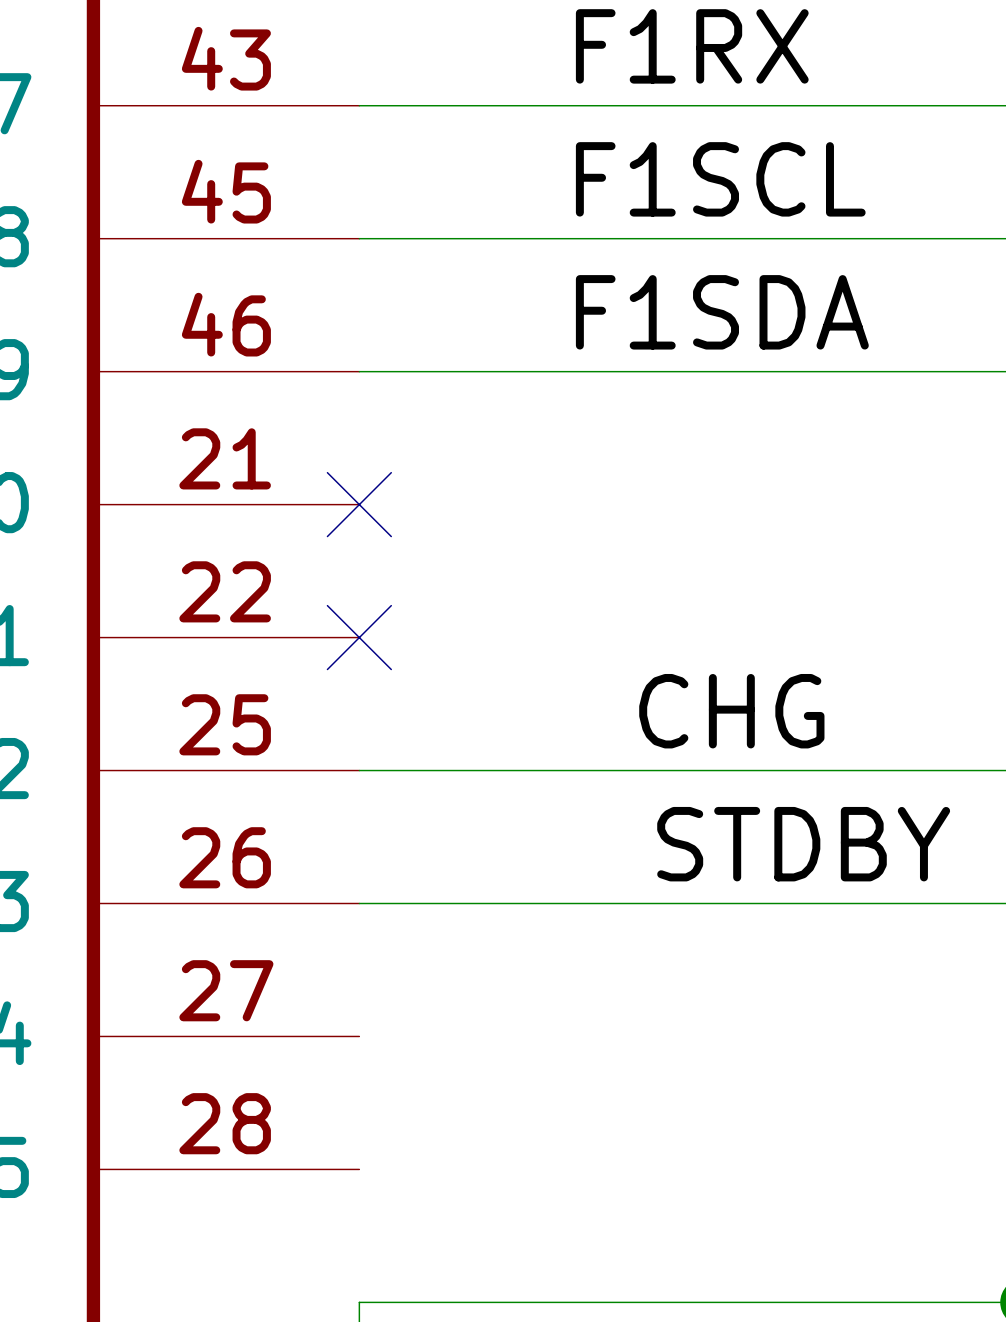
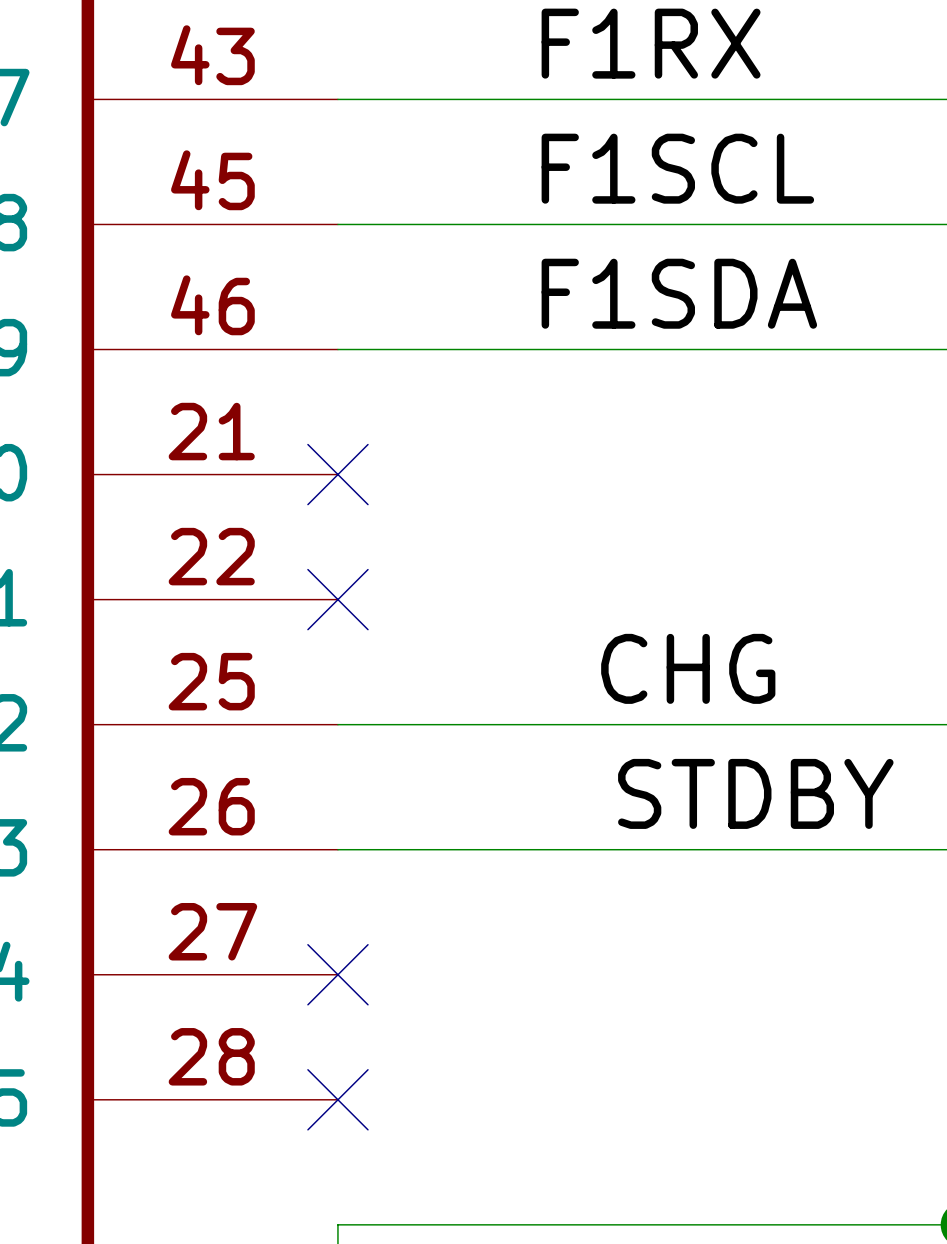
no-connect mark: none -> (337, 974)
no-connect mark: none -> (337, 1099)

